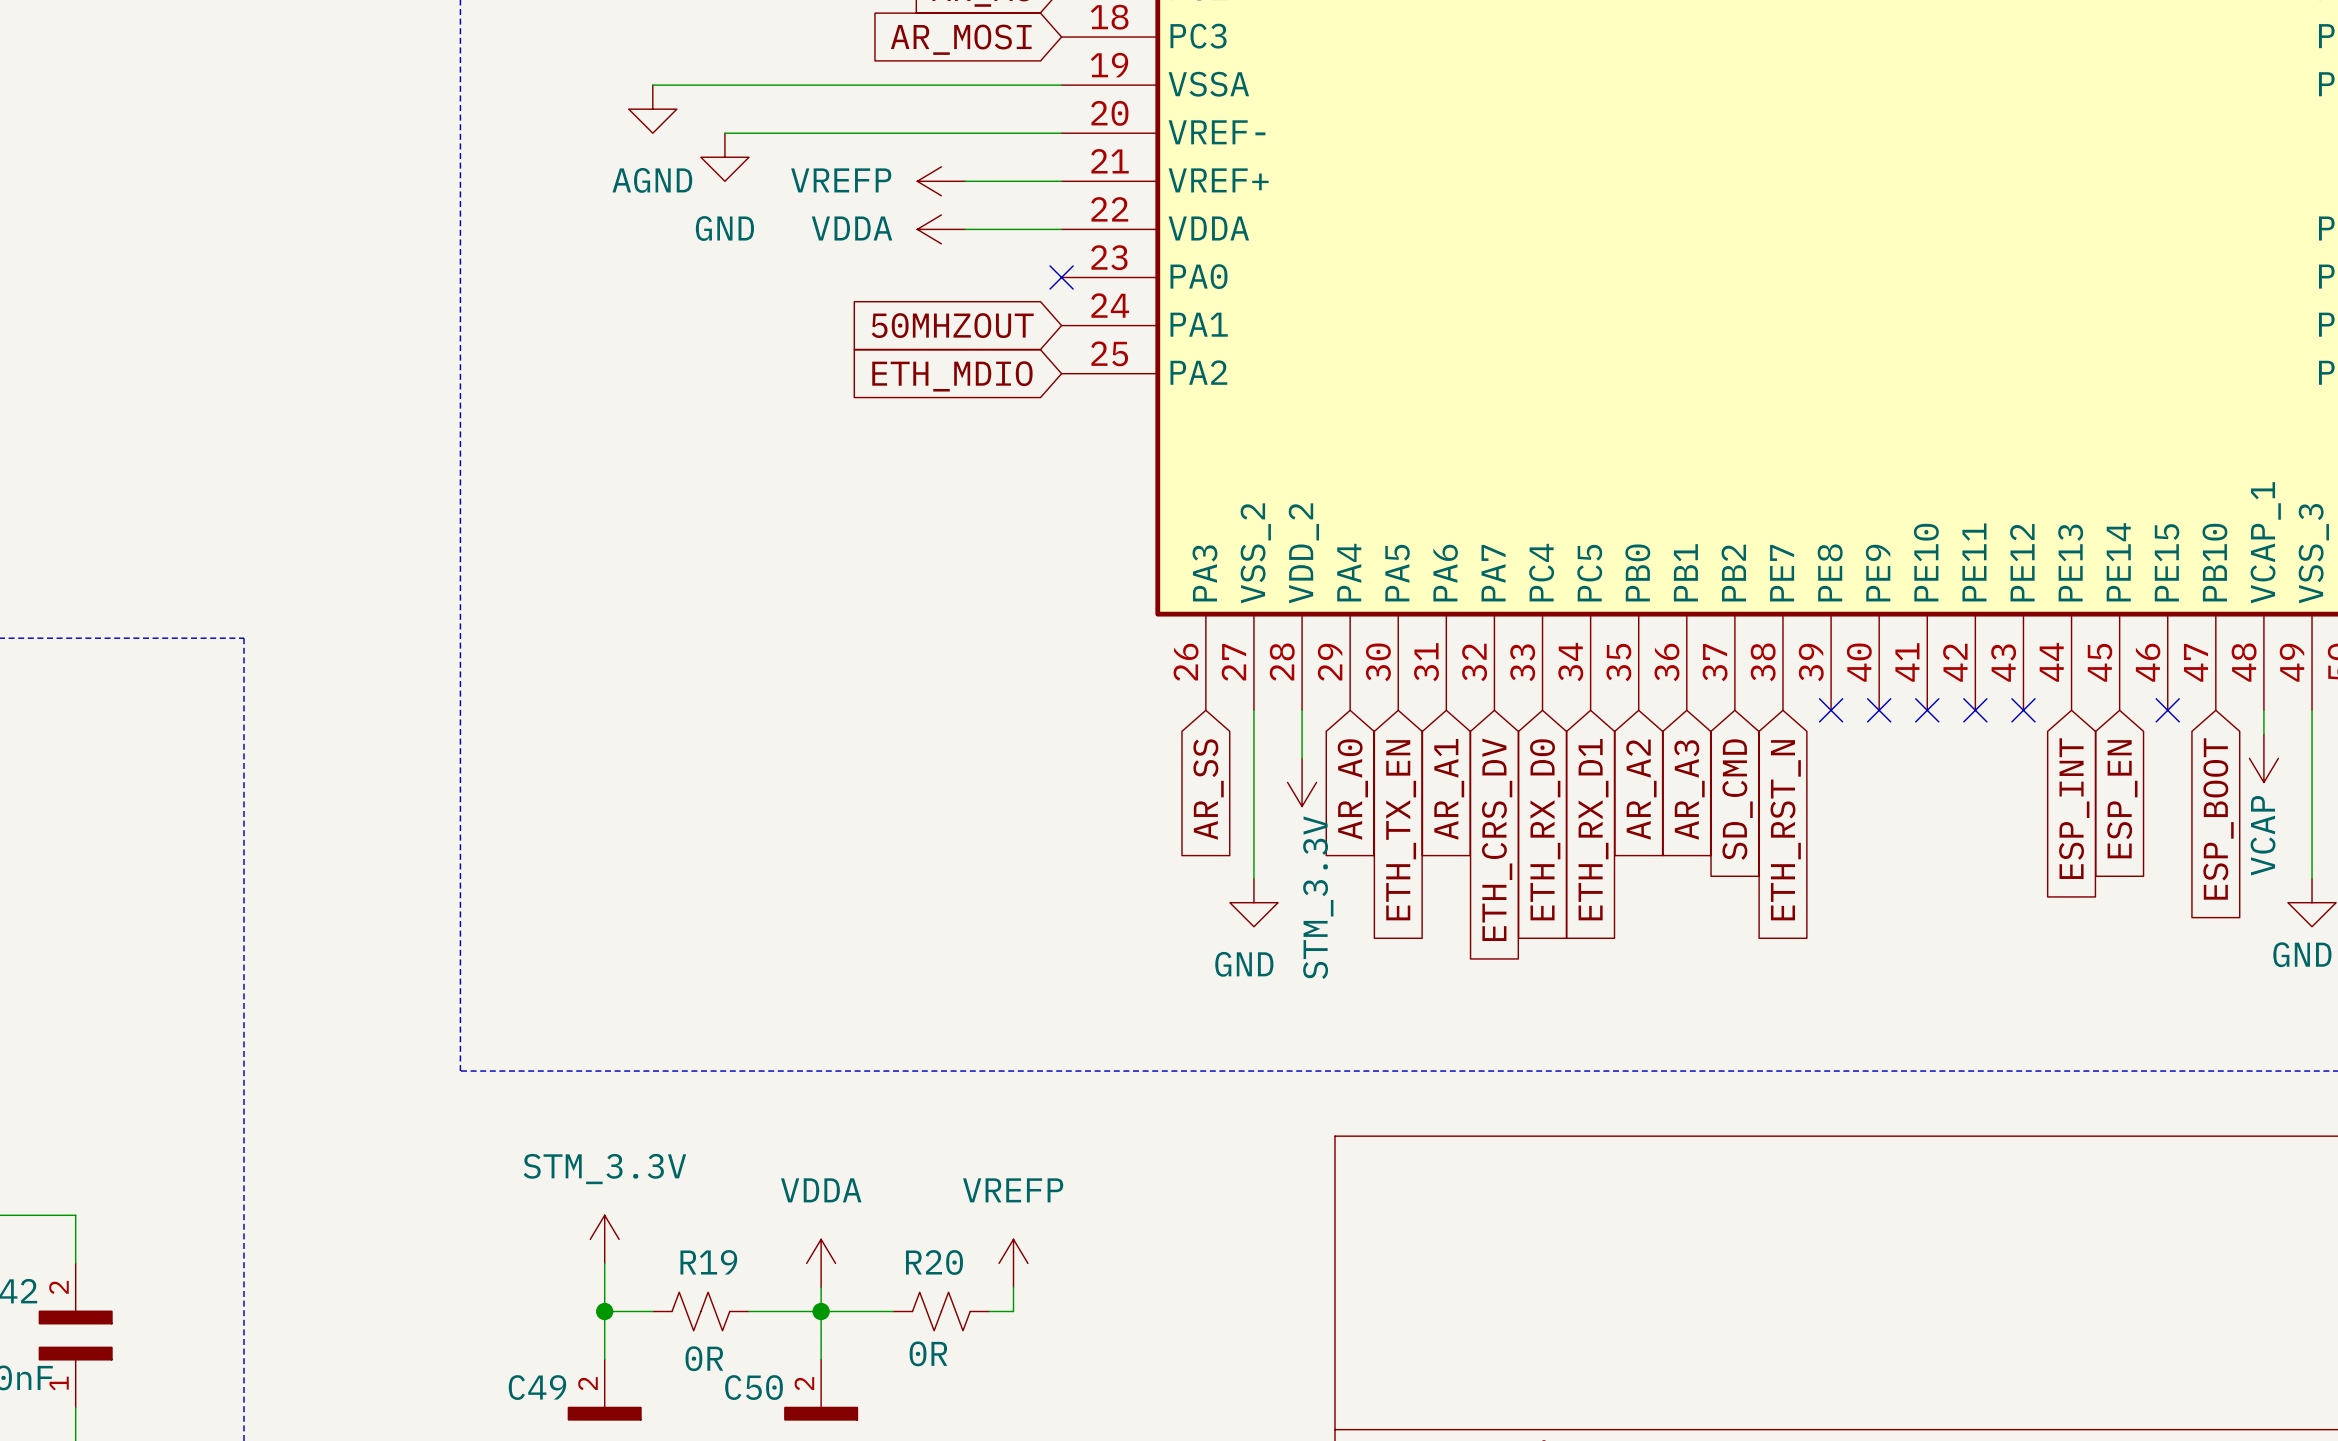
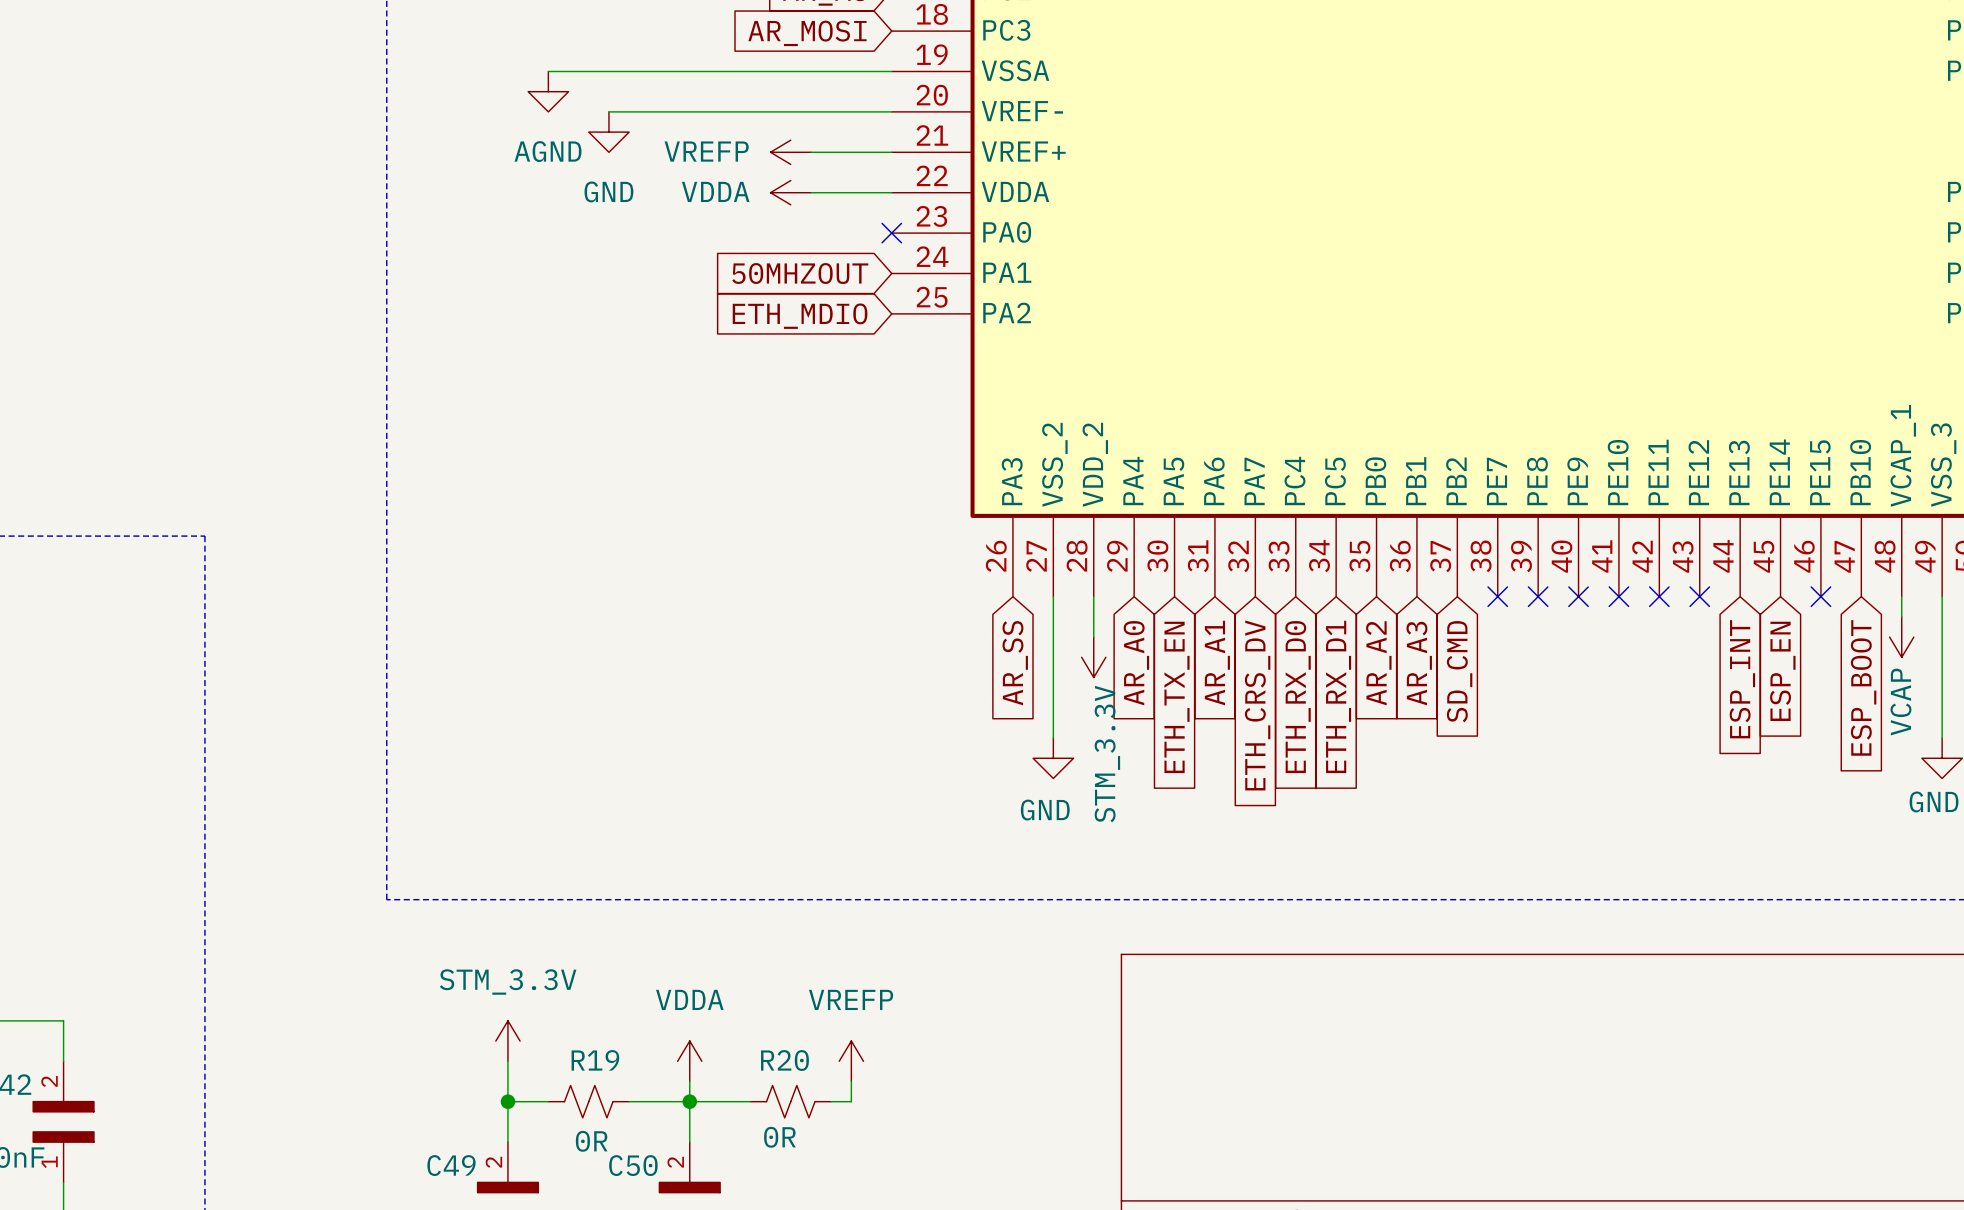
no-connect mark: none -> (1497, 596)
global label: ETH_RST_N (1785, 830) -> none

